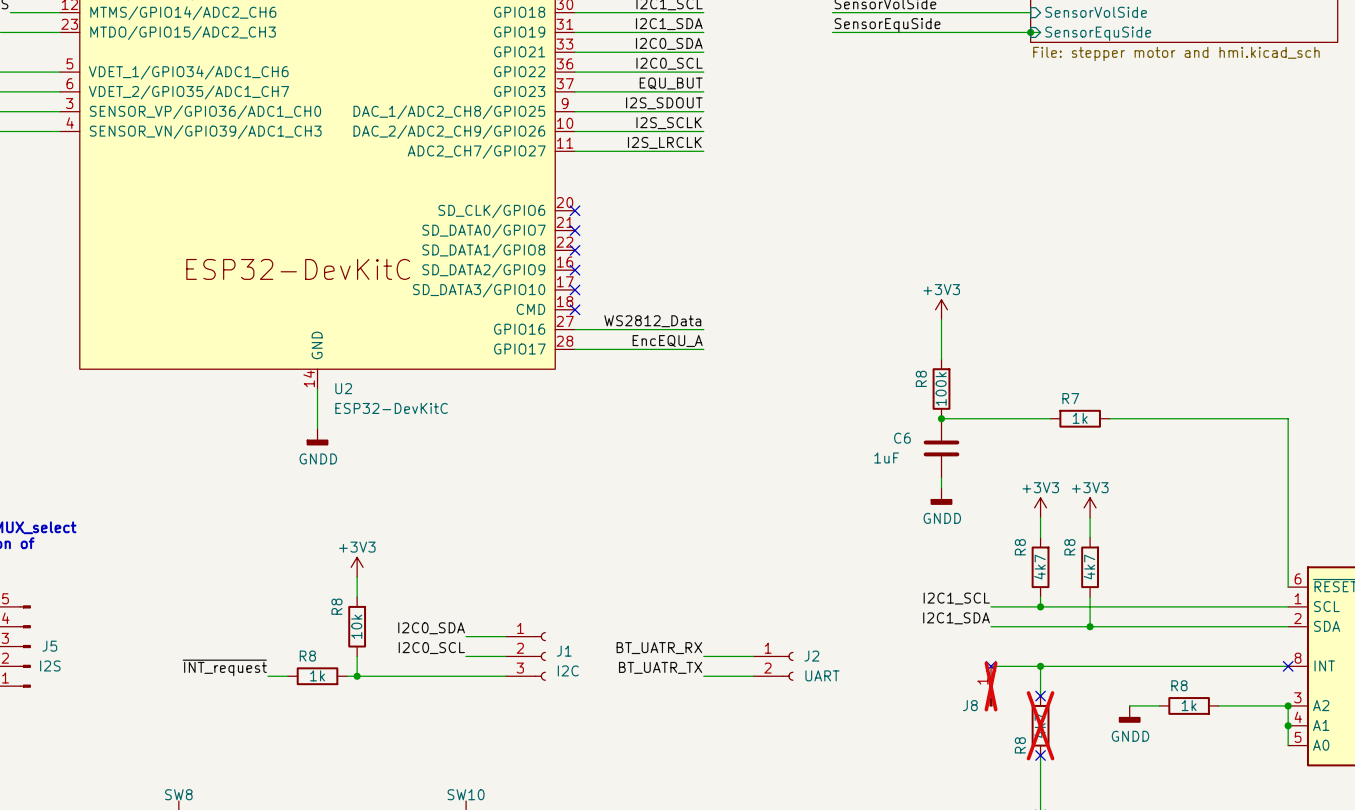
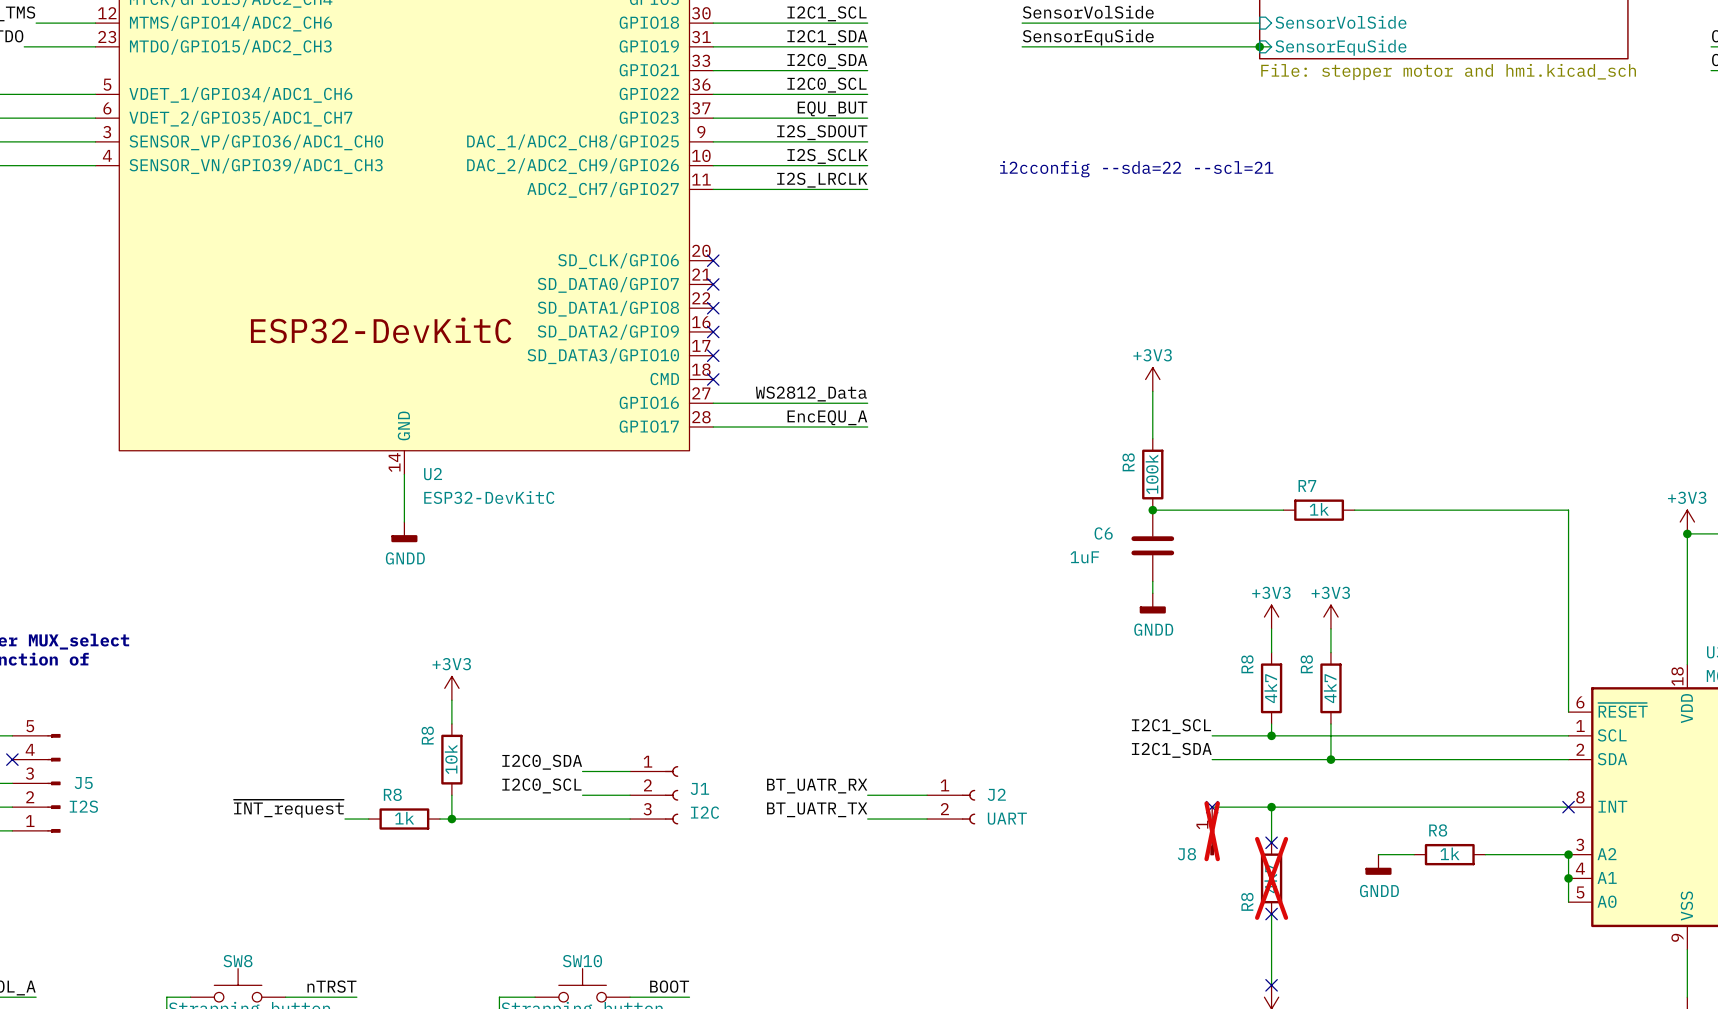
text: none -> i2cconfig --sda=22 --scl=21 (1136, 169)

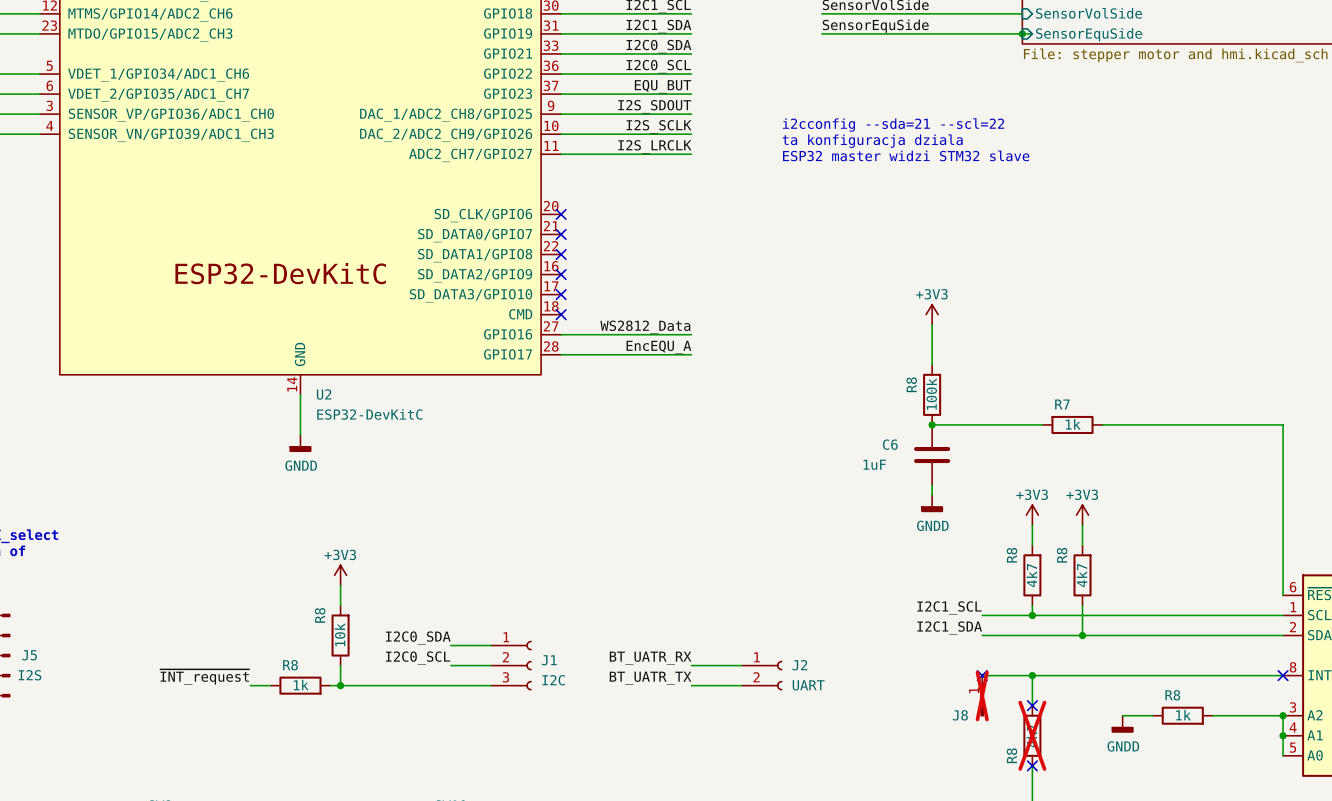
text: i2cconfig --sda=22 --scl=21 (1136, 169) -> i2cconfig --sda=21 --scl=22 (893, 125)
text: none -> ta konfiguracja dziala (872, 141)
text: none -> ESP32 master widzi STM32 slave (906, 155)

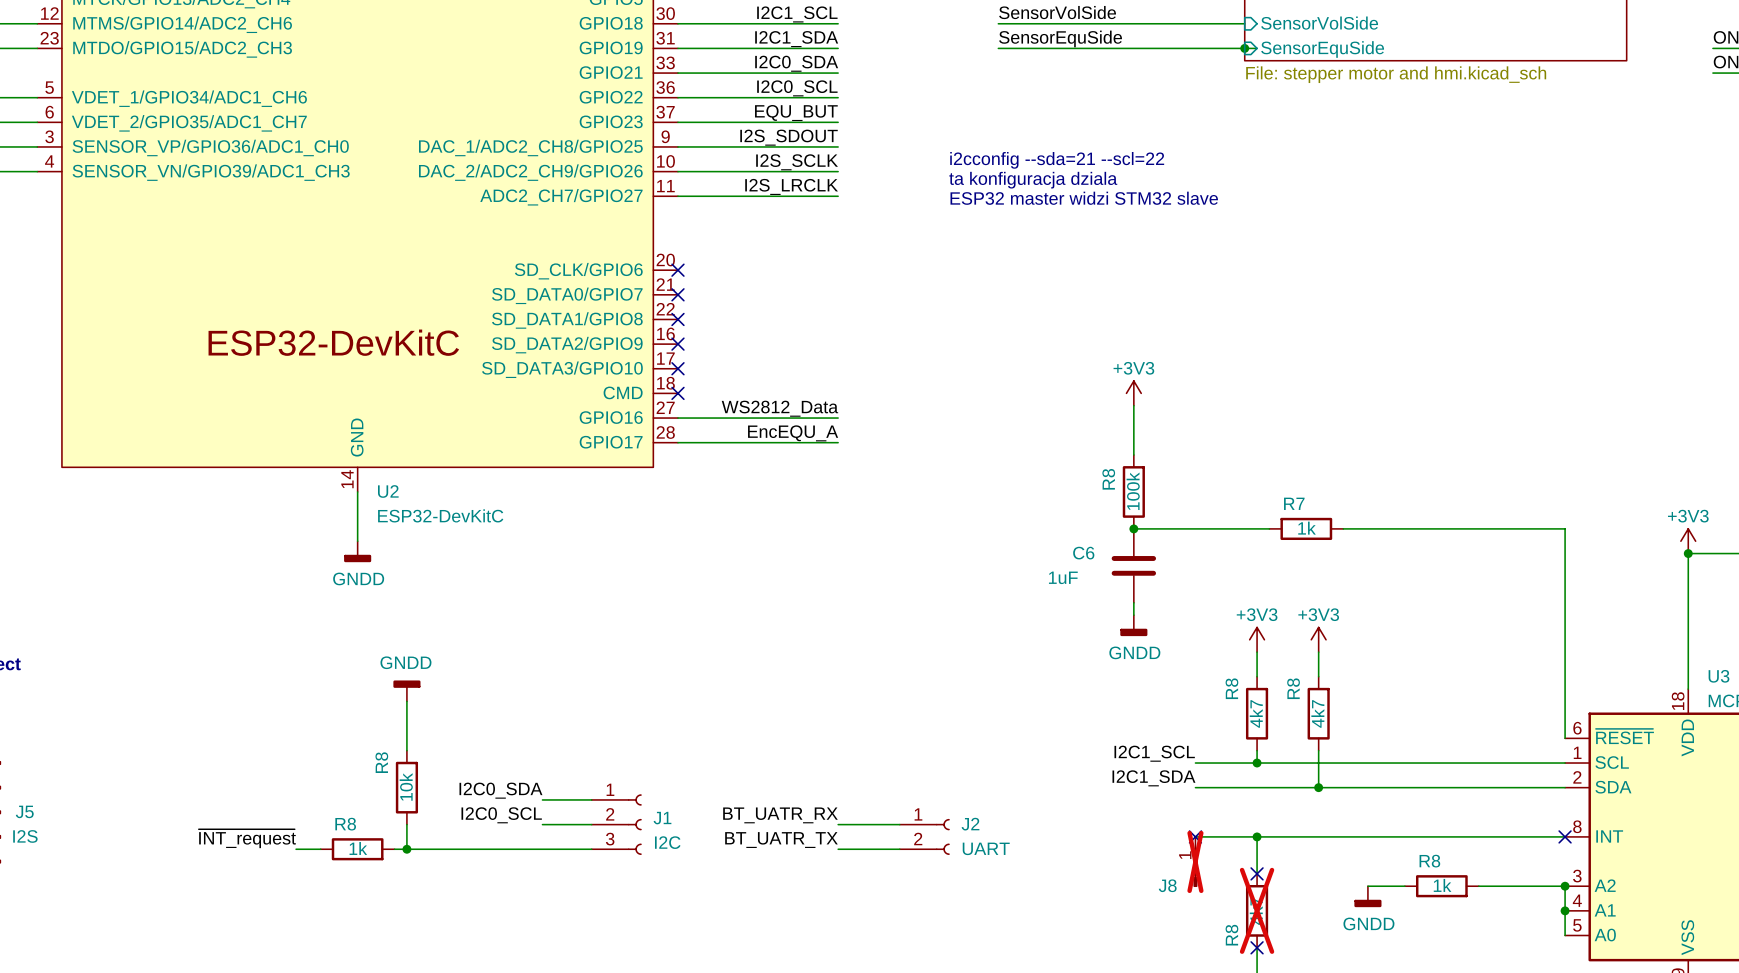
power symbol: none -> GNDD (406, 690)
power symbol: +3V3 (340, 575) -> none

